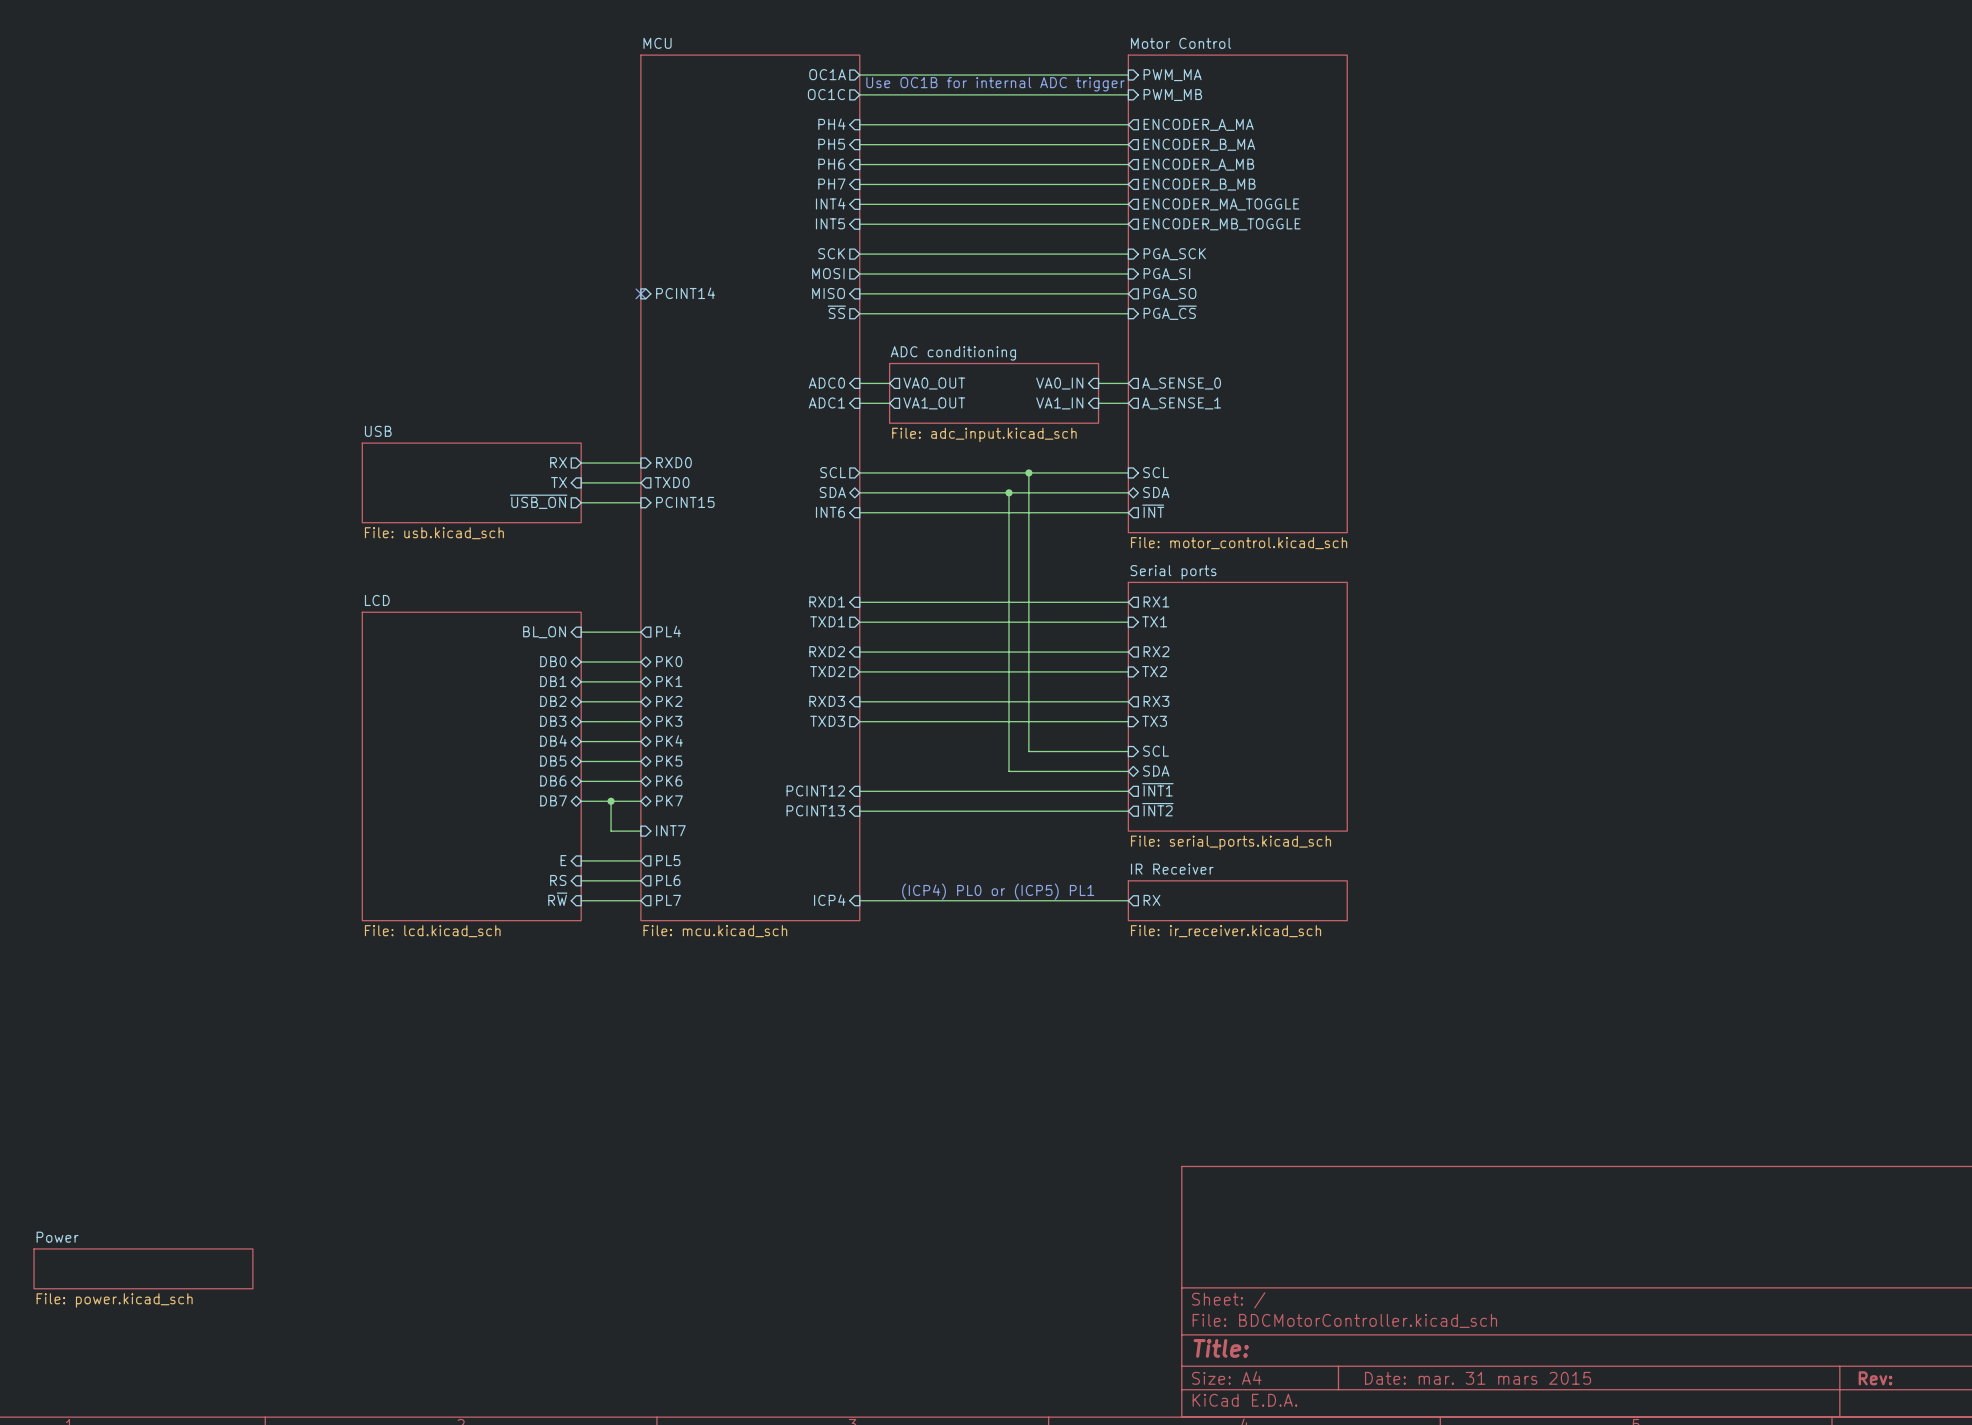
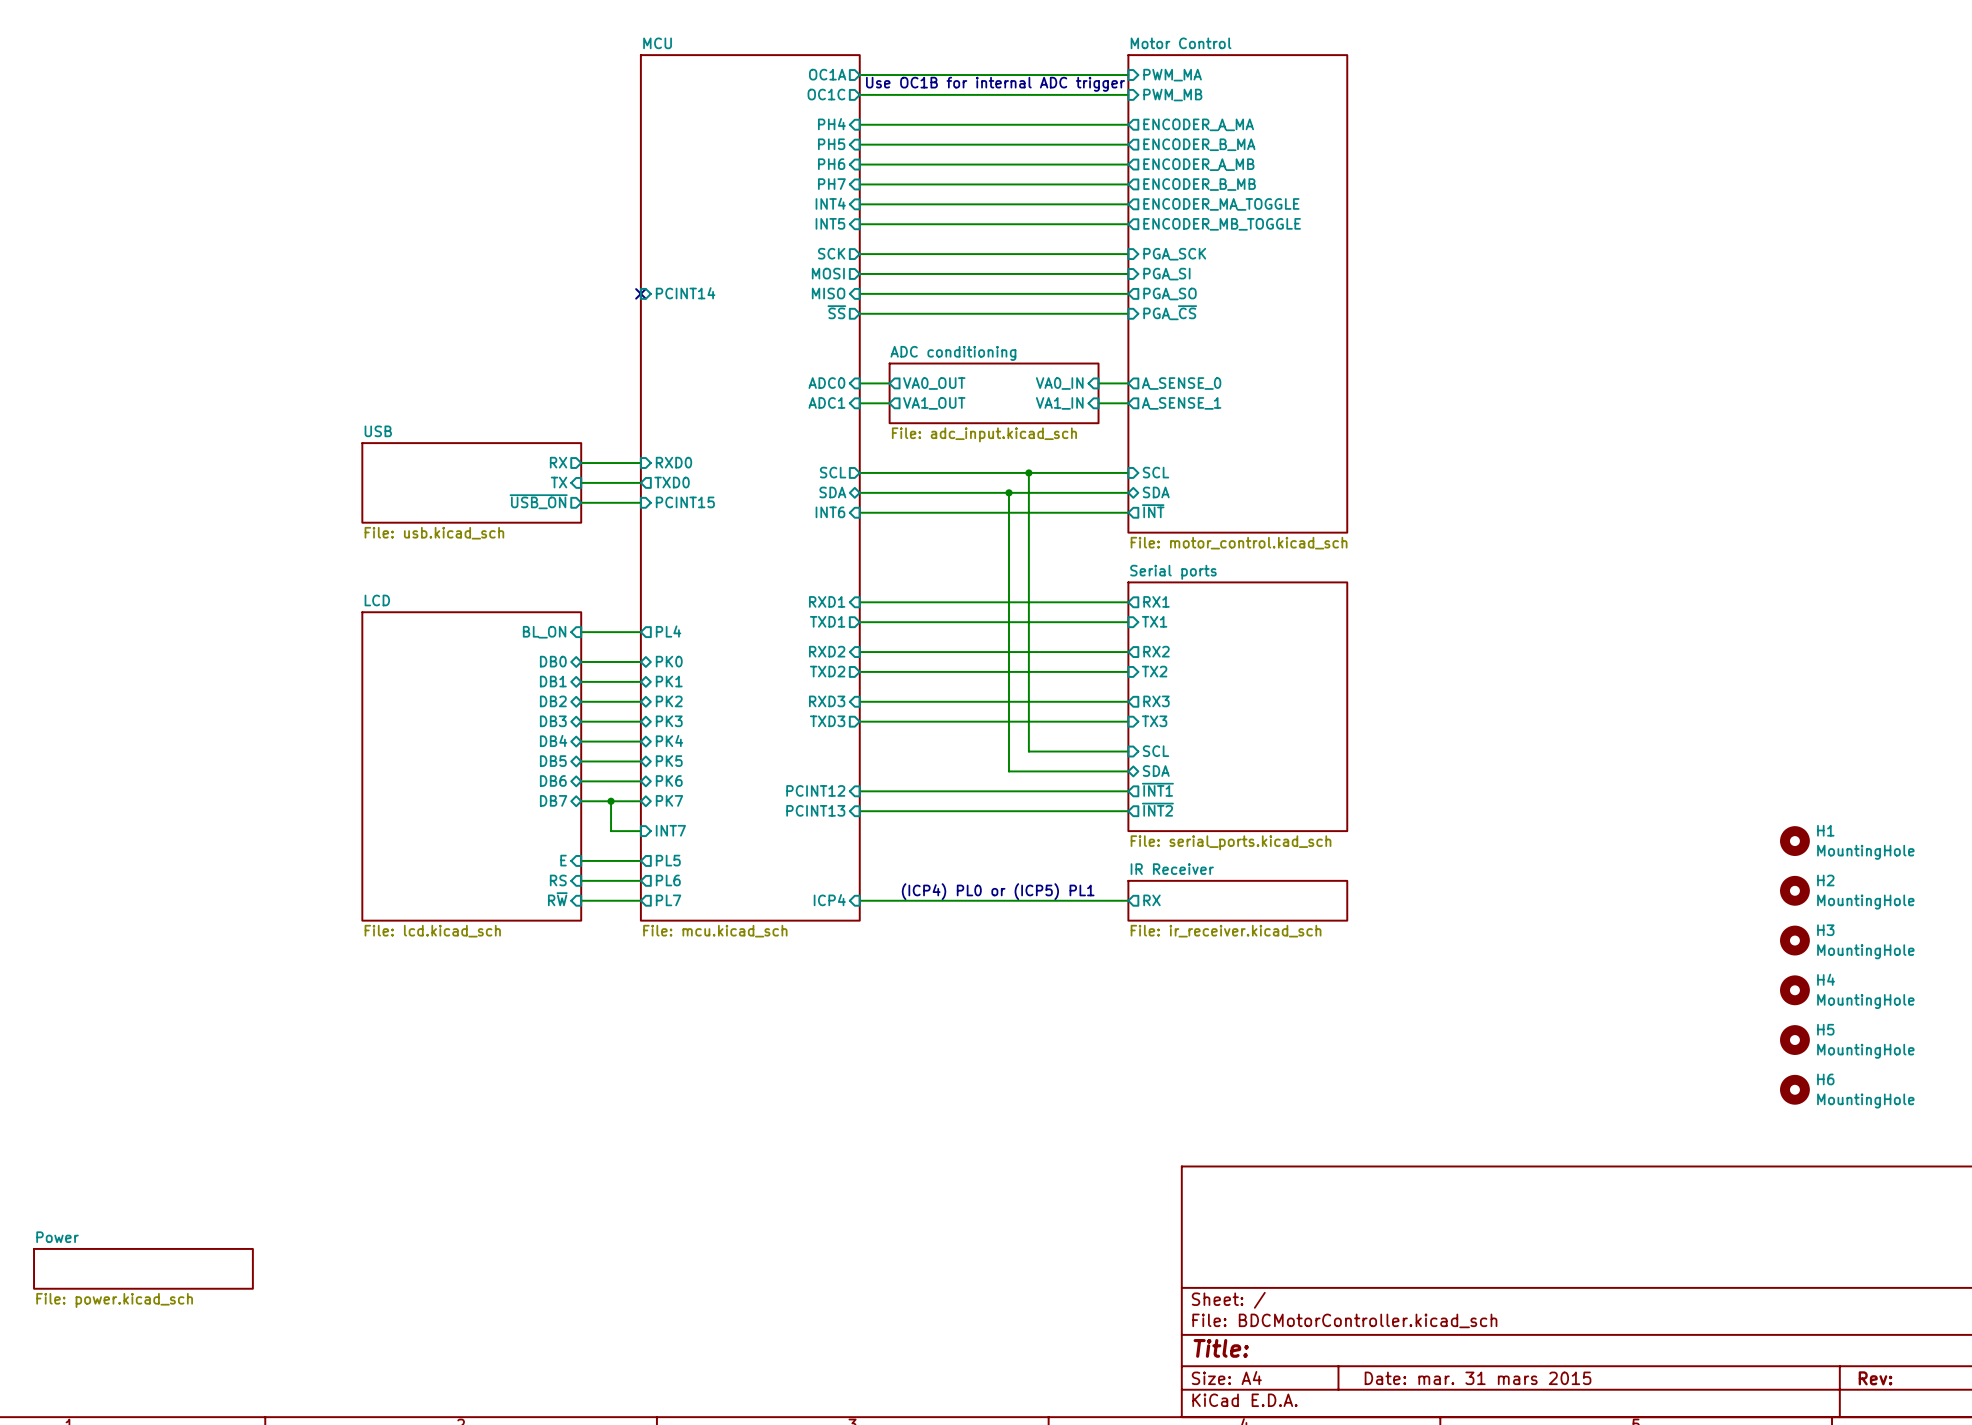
H1: none -> MountingHole (1794, 841)
H2: none -> MountingHole (1794, 890)
H3: none -> MountingHole (1794, 940)
H4: none -> MountingHole (1794, 990)
H5: none -> MountingHole (1794, 1040)
H6: none -> MountingHole (1794, 1089)

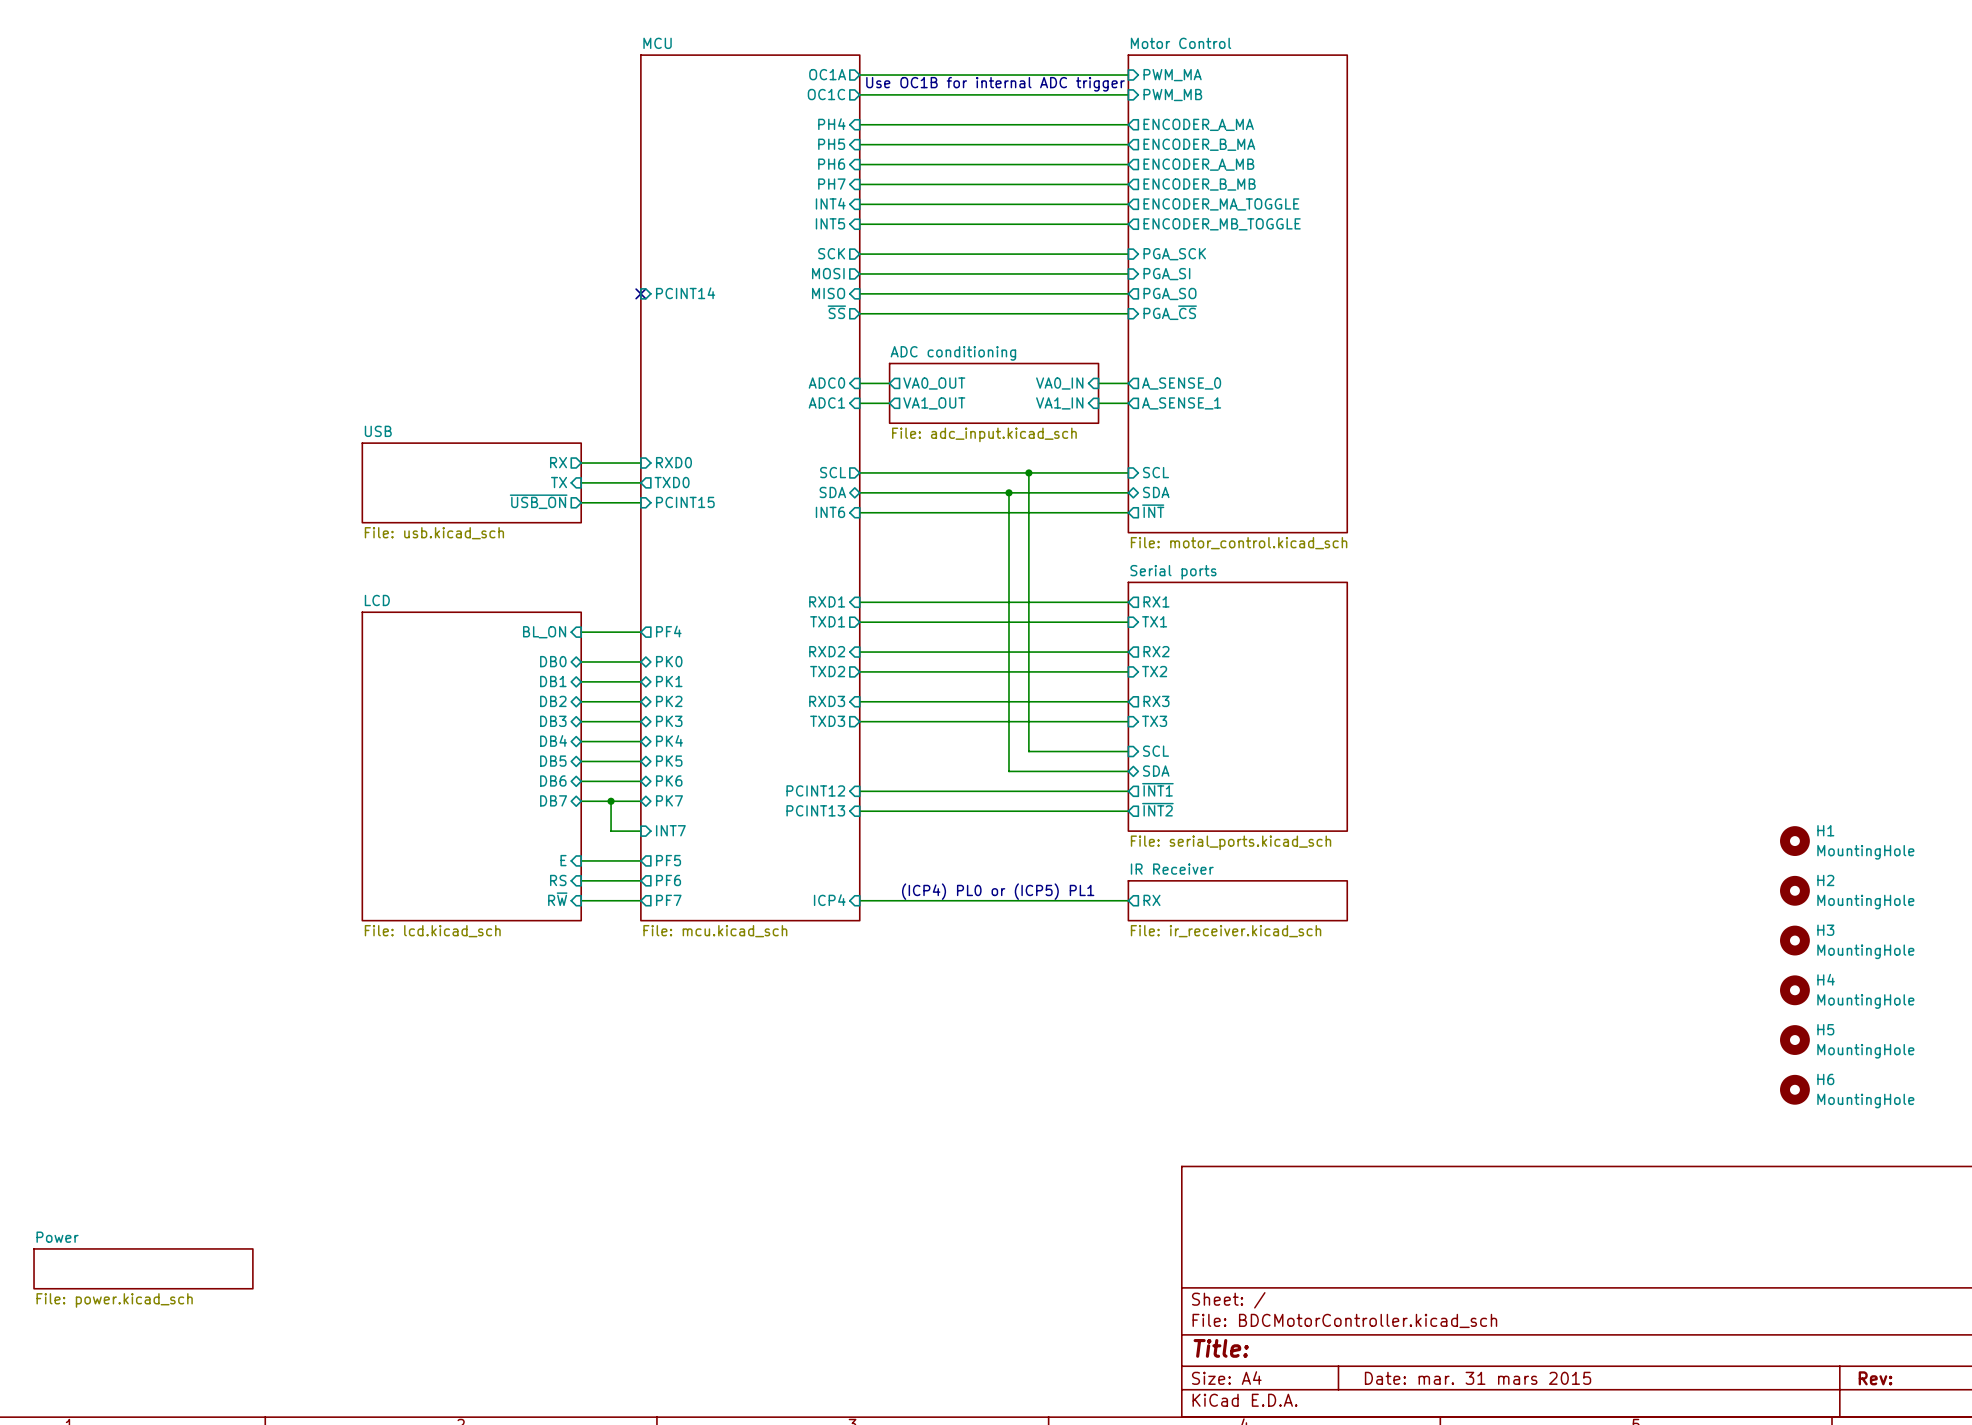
sheet pin: PL4 (668, 631) -> PF4 (668, 631)
sheet pin: PL5 (668, 860) -> PF5 (668, 860)
sheet pin: PL6 (668, 880) -> PF6 (668, 880)
sheet pin: PL7 (668, 900) -> PF7 (668, 900)

